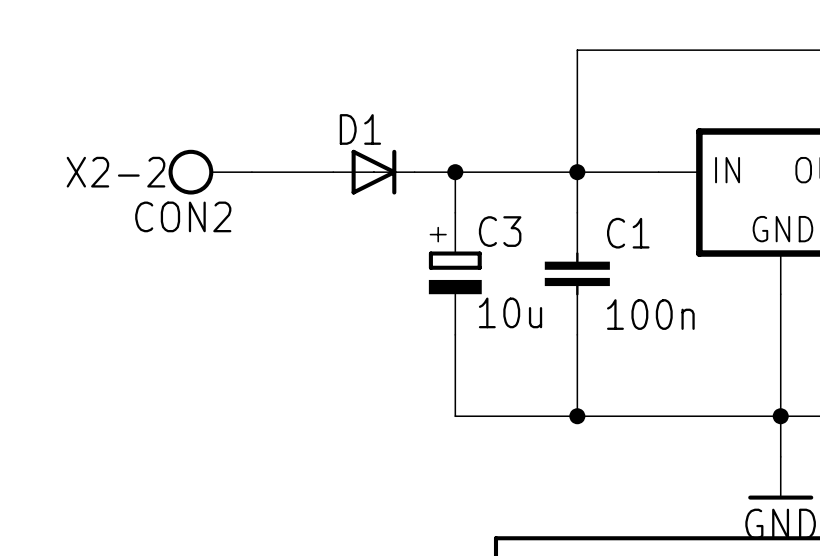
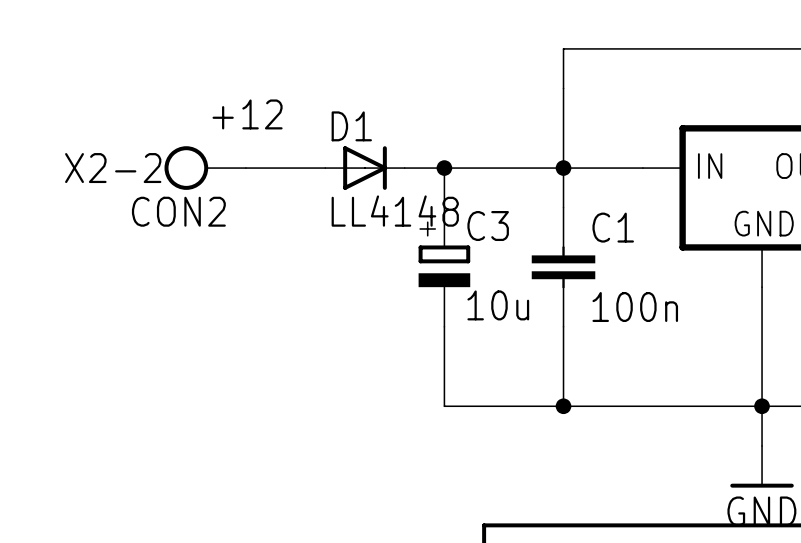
label: none -> +12 (247, 114)
D1 value: none -> LL4148 (395, 211)

